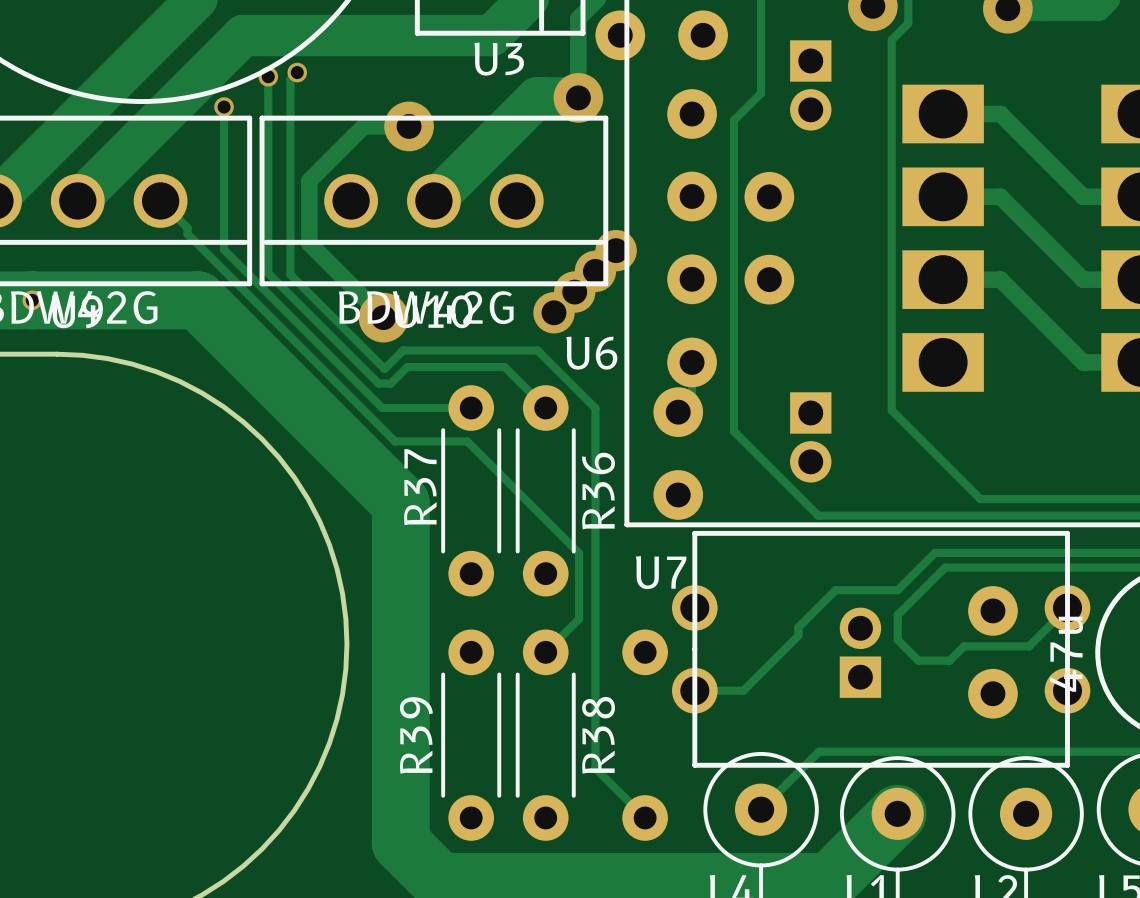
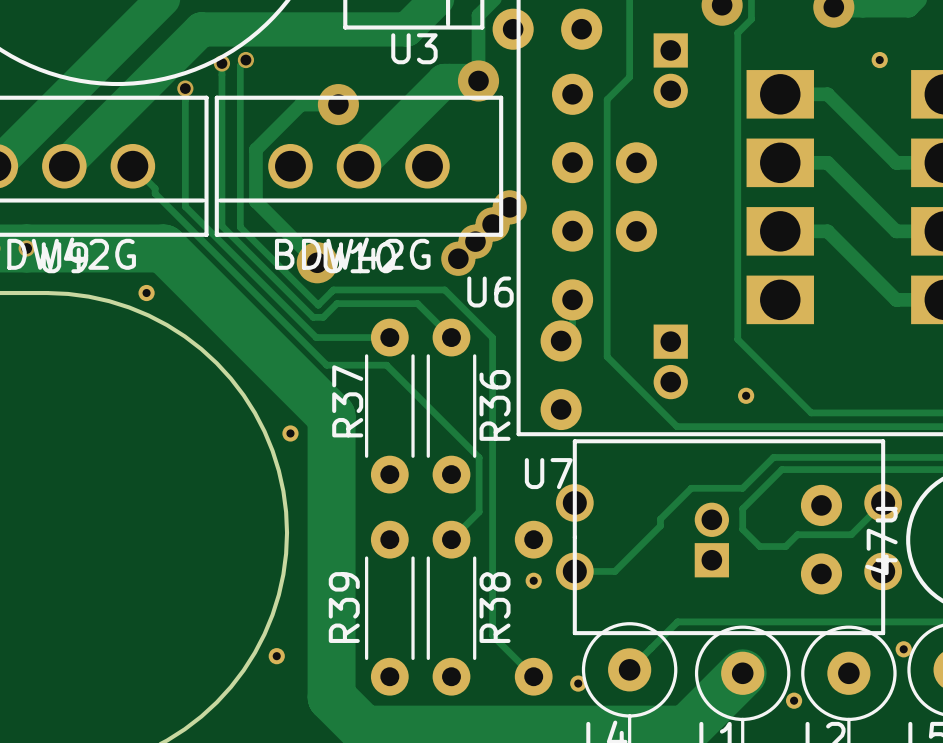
part: none -> (879, 60)
part: none -> (146, 293)
part: none -> (746, 395)
part: none -> (290, 433)
part: none -> (533, 580)
part: none -> (903, 649)
part: none -> (276, 656)
part: none -> (578, 683)
part: none -> (794, 700)

